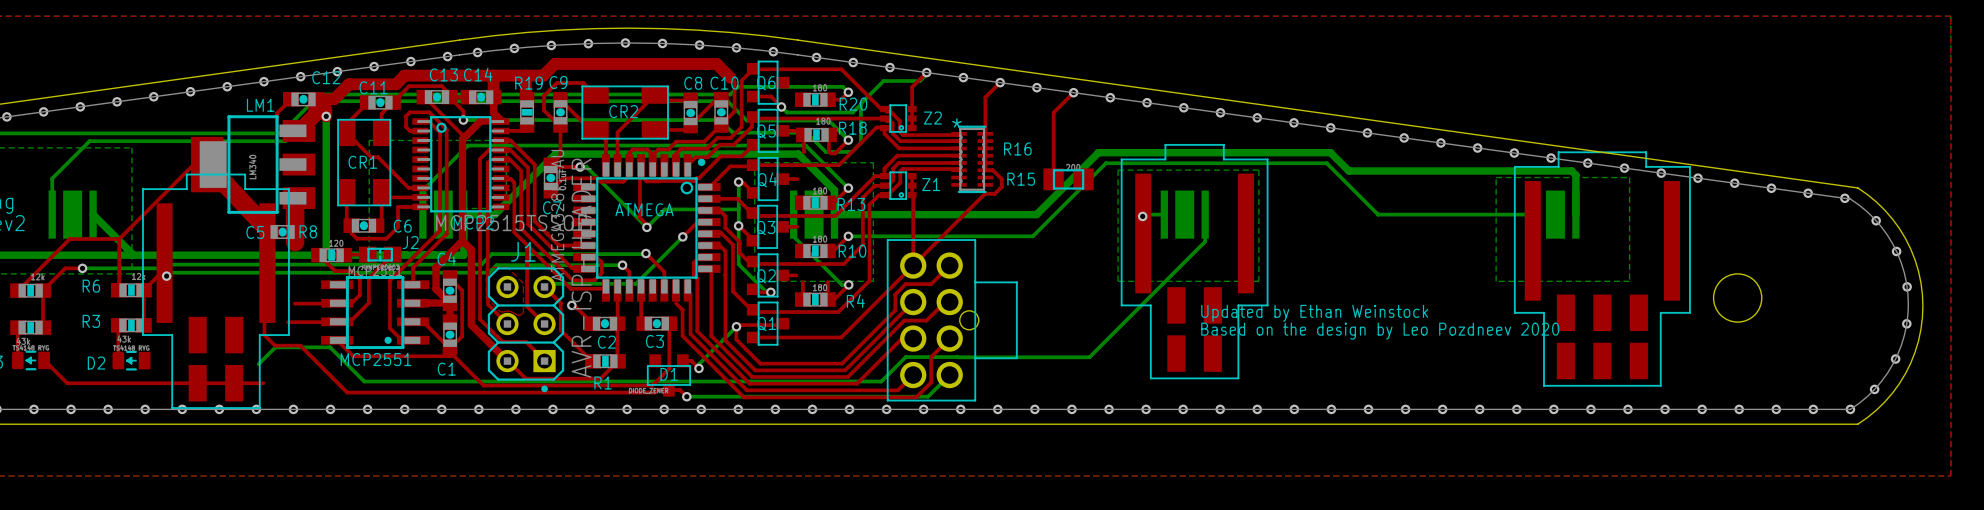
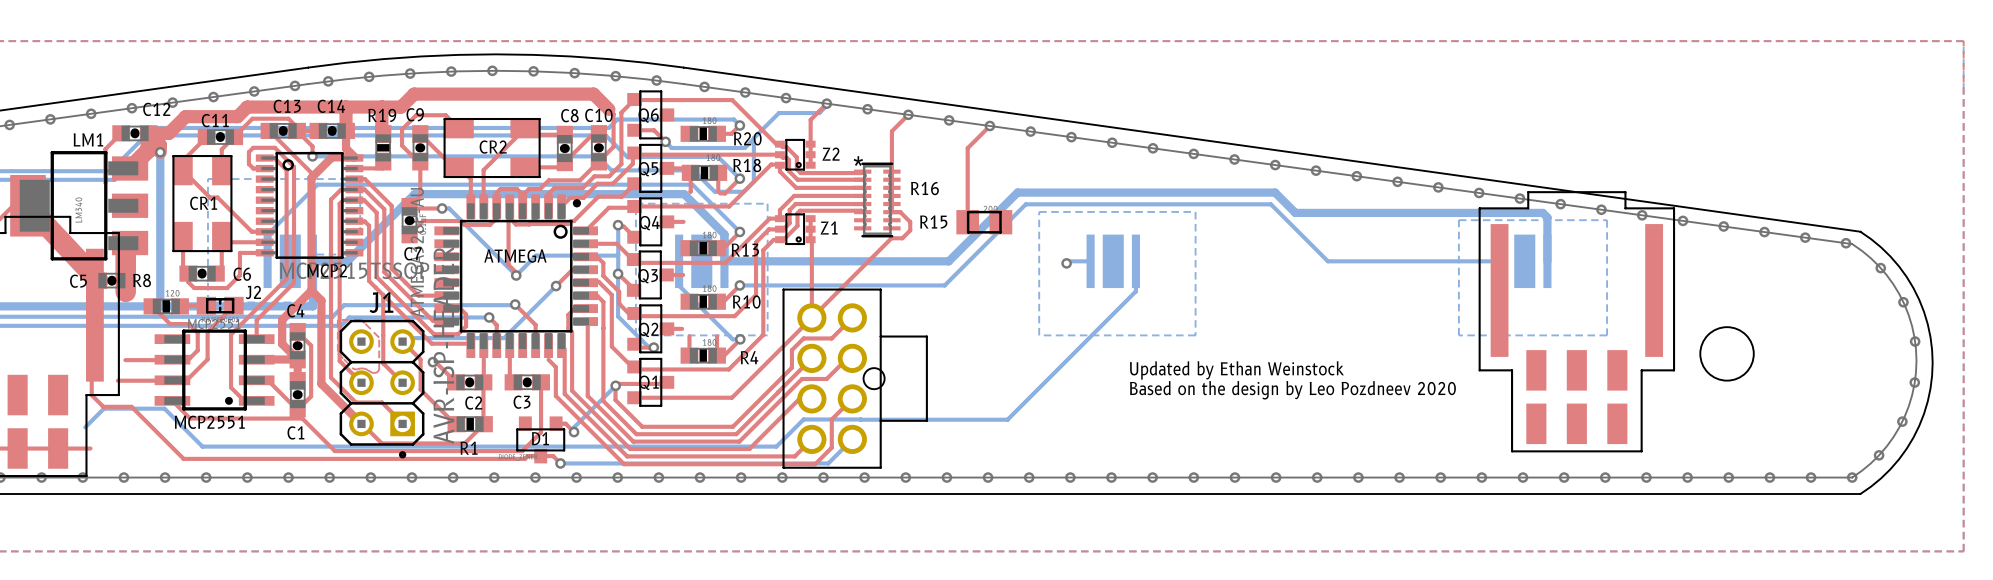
part: (1194, 261) -> none

